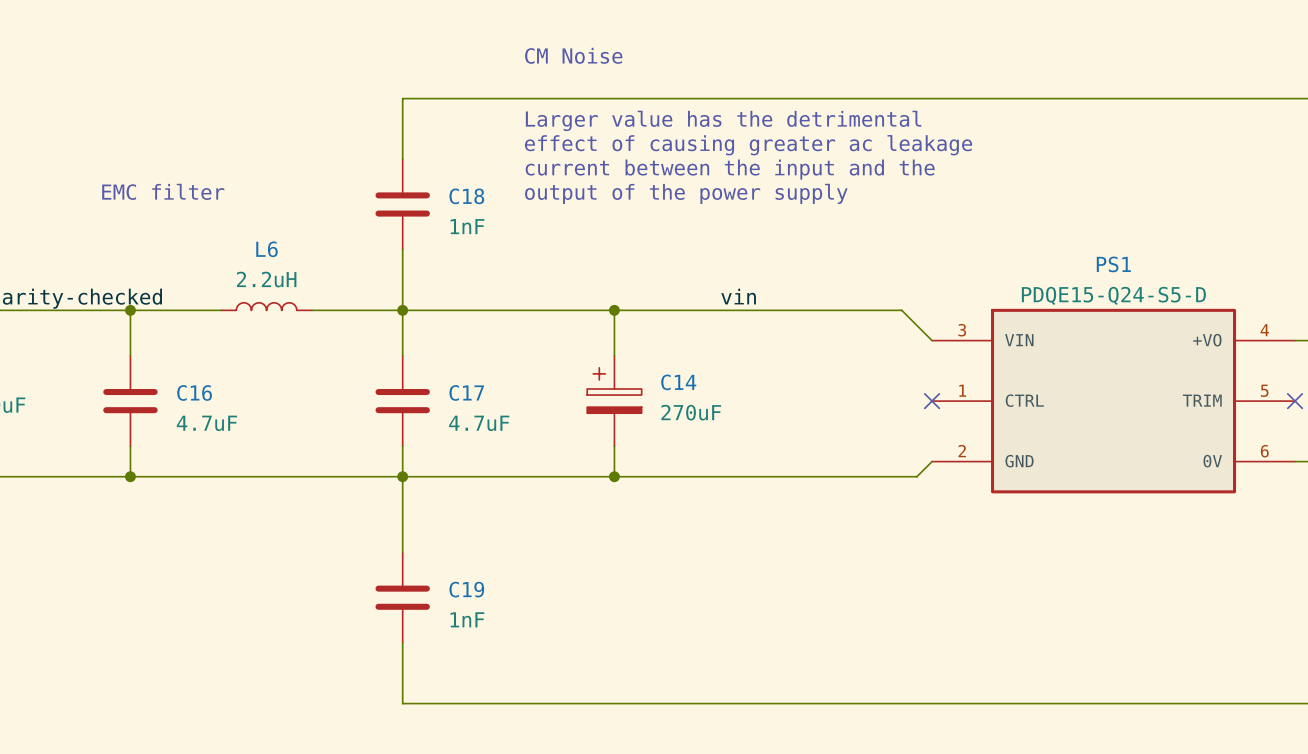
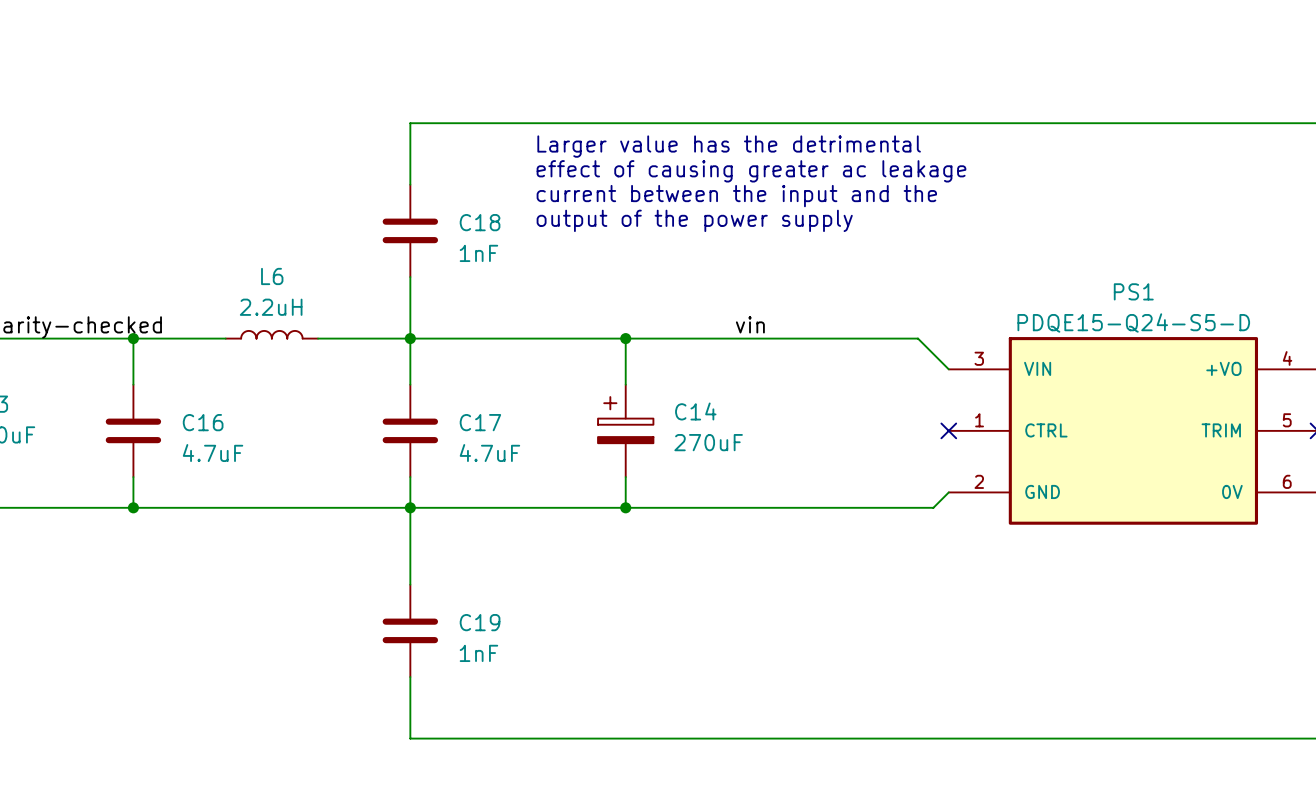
text: CM Noise (573, 55) -> none
text: EMC filter (163, 191) -> none

